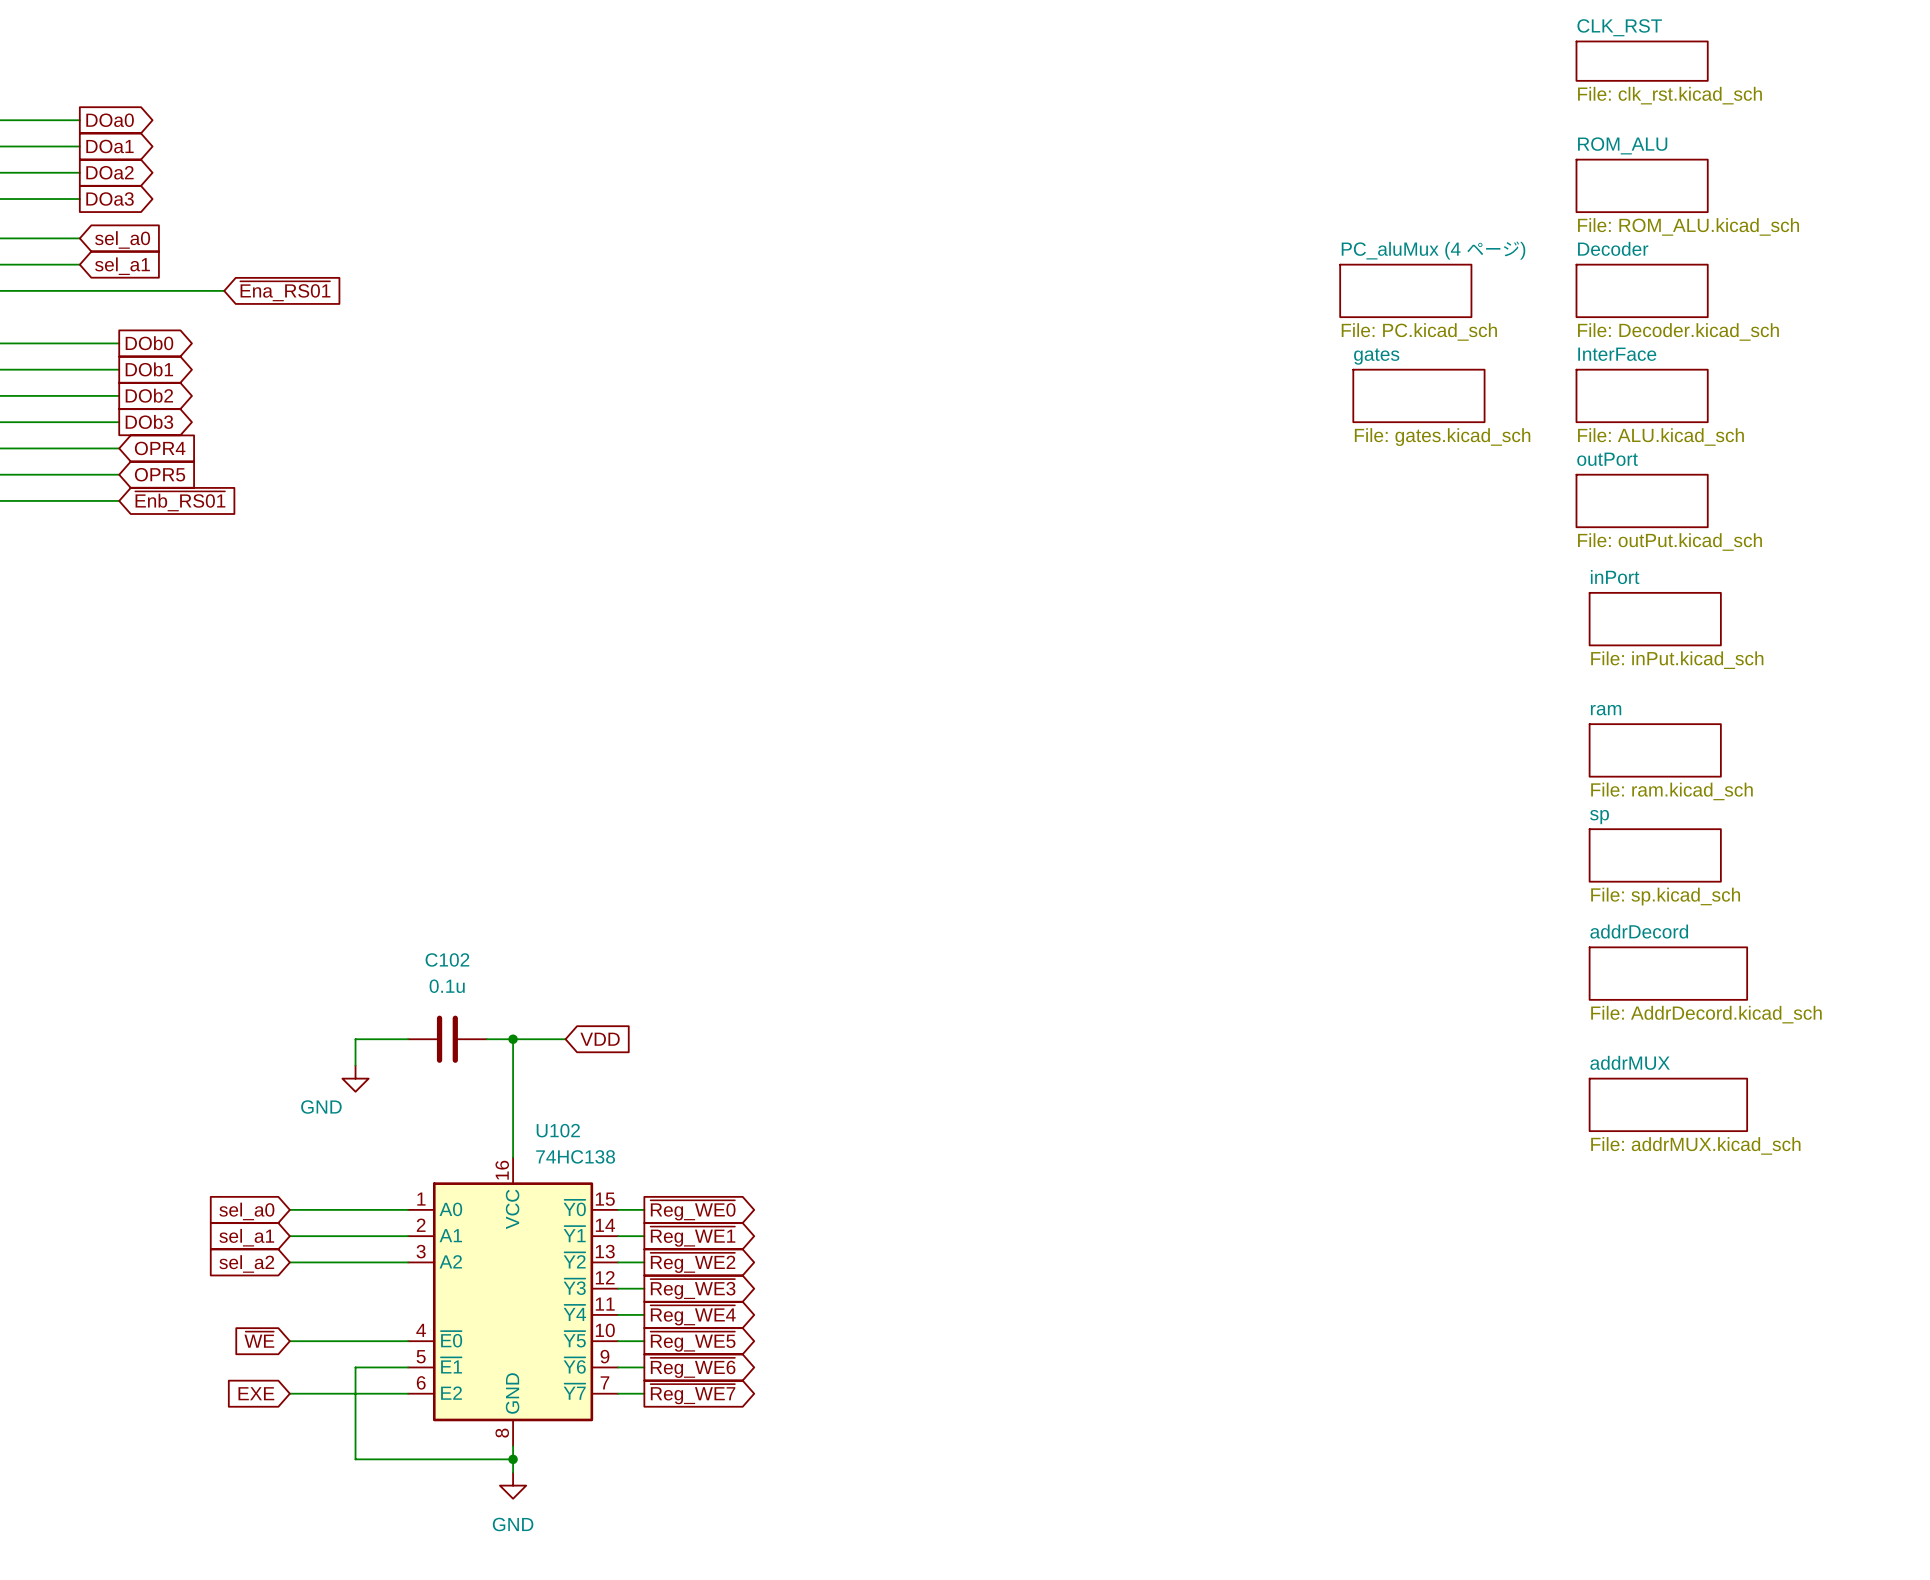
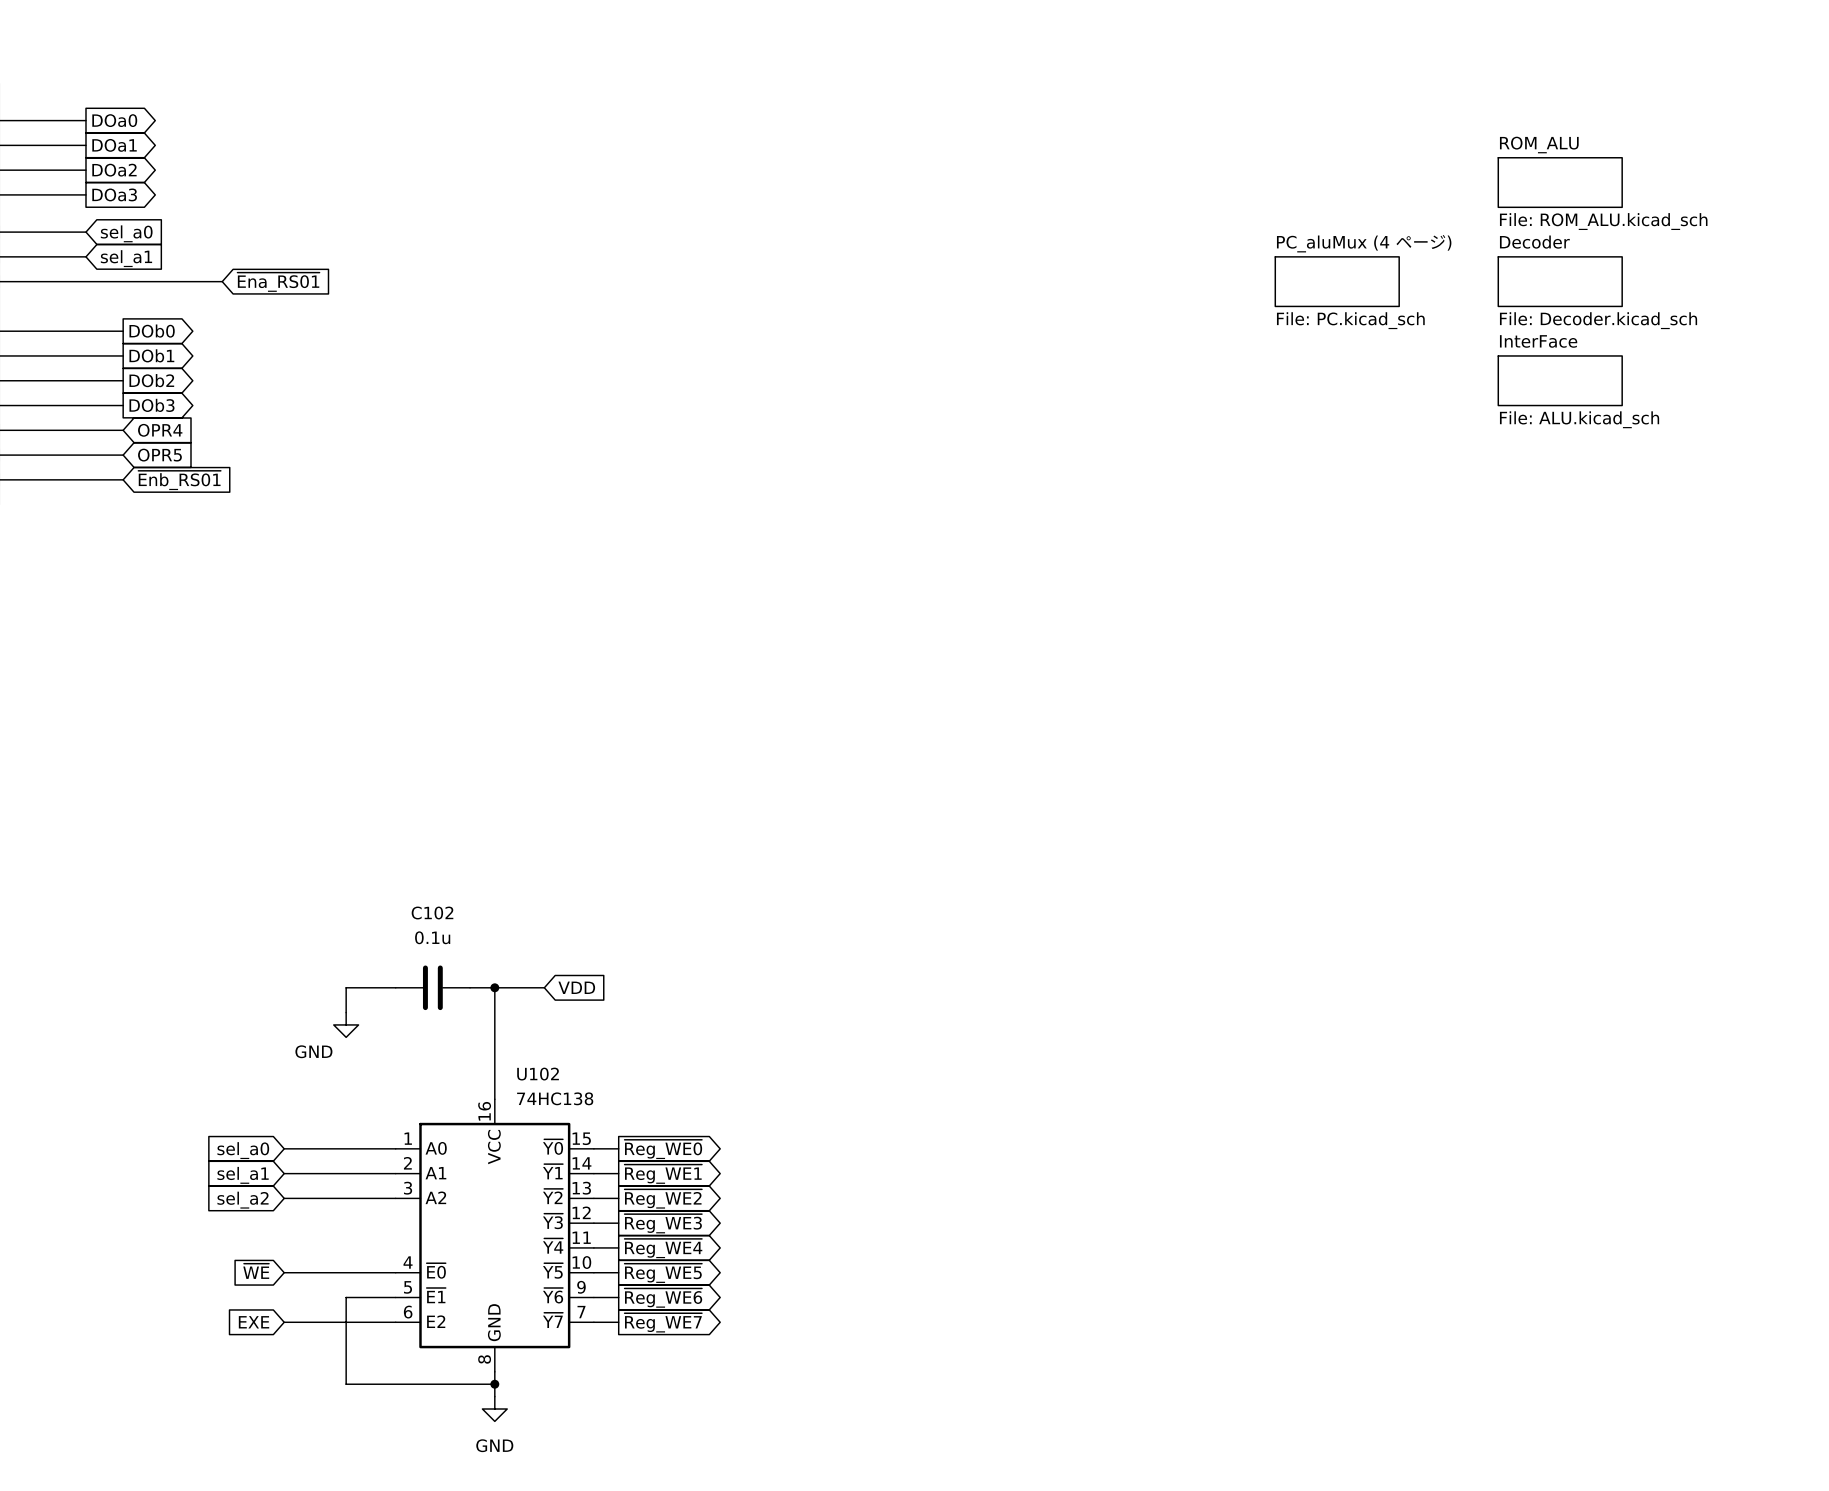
sheet CLK_RST: File: clk_rst.kicad_sch (1642, 61) -> none
sheet gates: File: gates.kicad_sch (1418, 395) -> none
sheet outPort: File: outPut.kicad_sch (1642, 500) -> none
sheet inPort: File: inPut.kicad_sch (1655, 619) -> none
sheet ram: File: ram.kicad_sch (1655, 750) -> none
sheet sp: File: sp.kicad_sch (1655, 855) -> none
sheet addrDecord: File: AddrDecord.kicad_sch (1668, 973) -> none
sheet addrMUX: File: addrMUX.kicad_sch (1668, 1104) -> none

